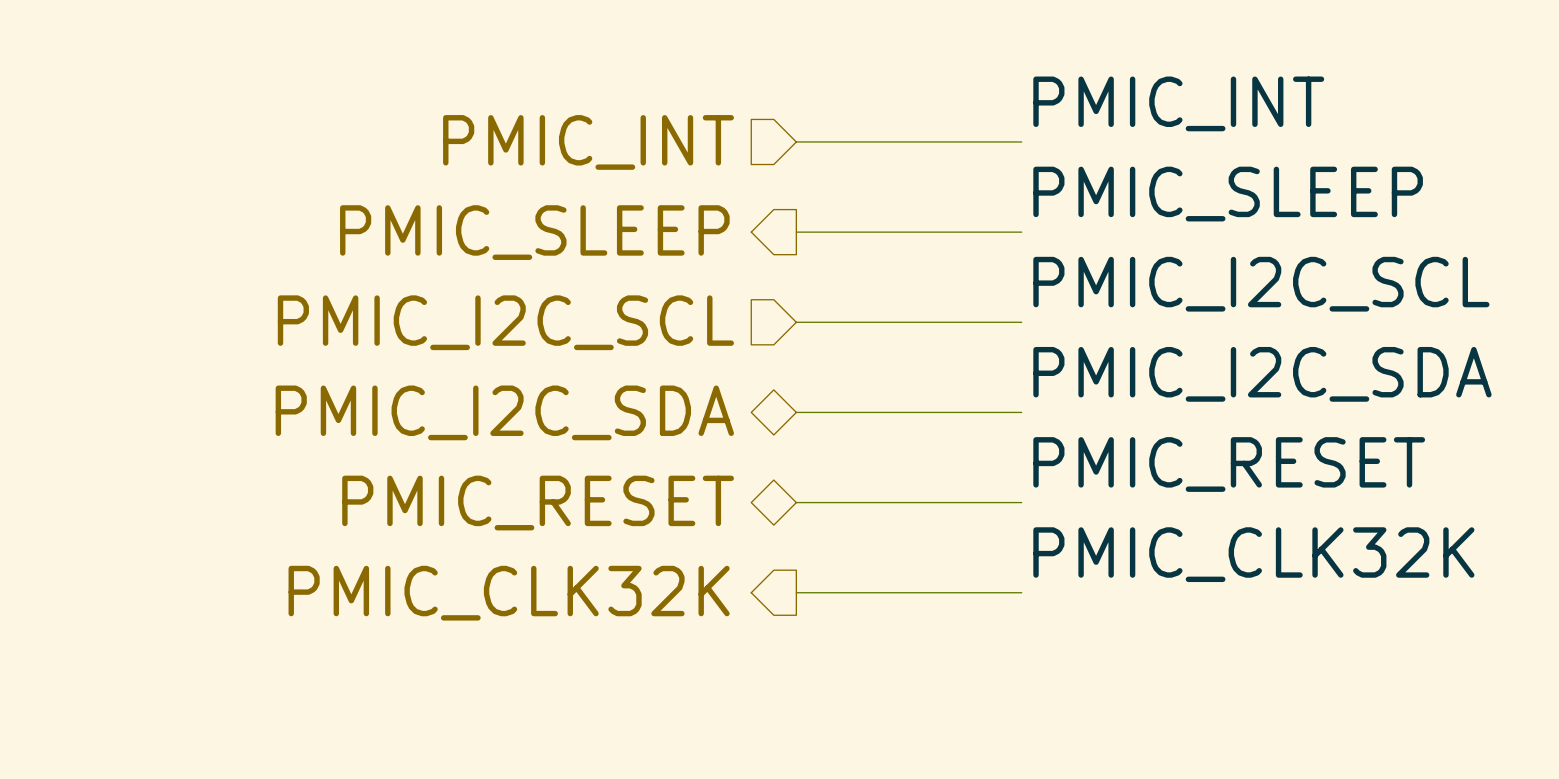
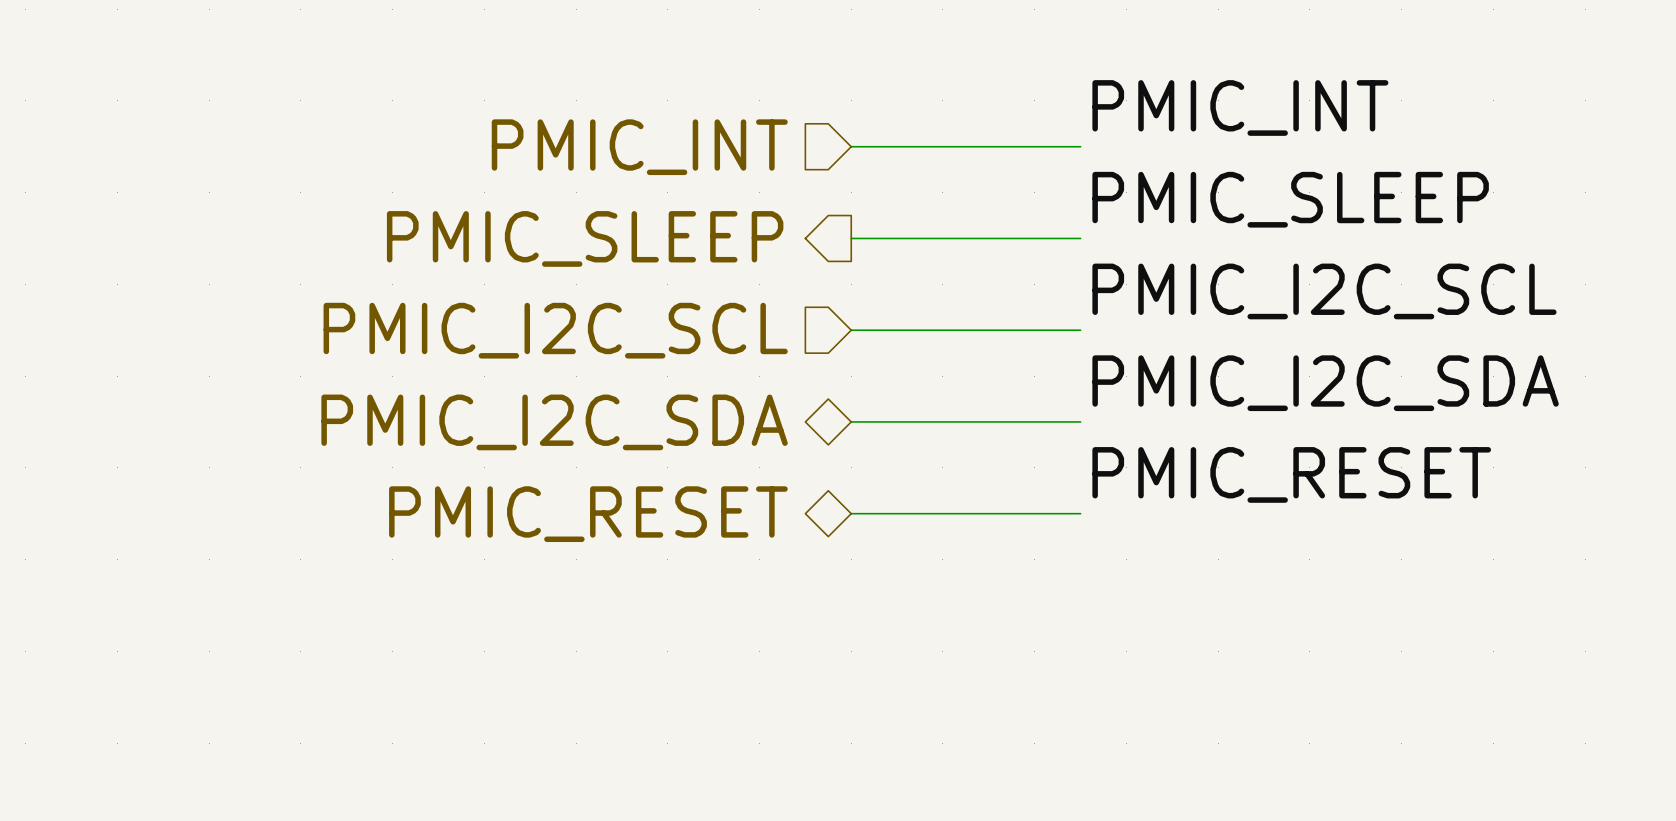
label: PMIC_CLK32K (1253, 554) -> none
wire: (796, 592) (1021, 592) -> none
hierarchical label: PMIC_CLK32K (509, 593) -> none

